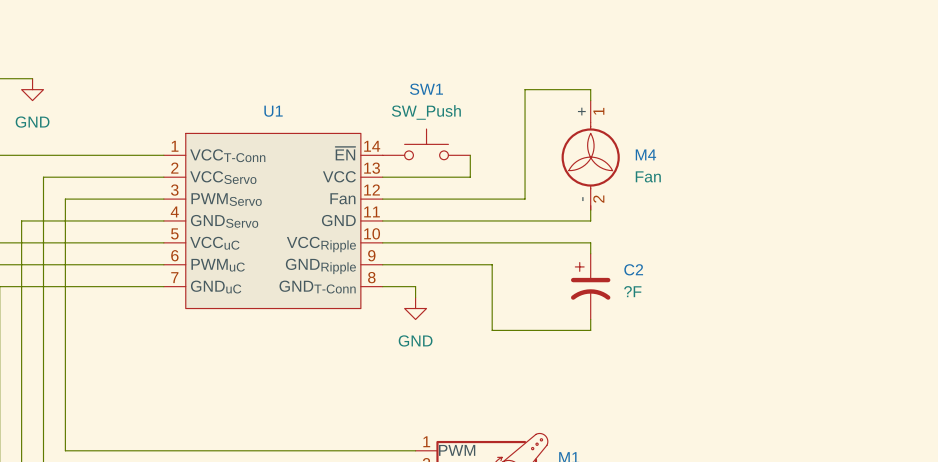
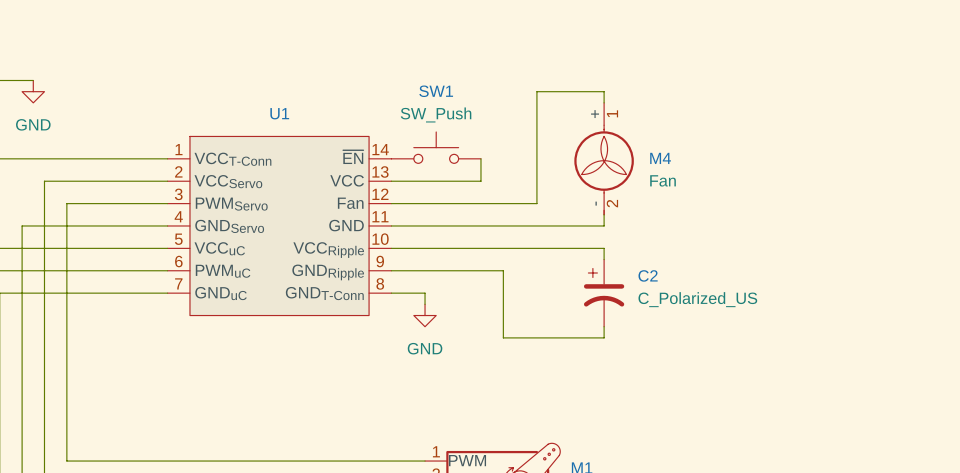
C2 value: ?F (632, 291) -> C_Polarized_US (697, 299)

